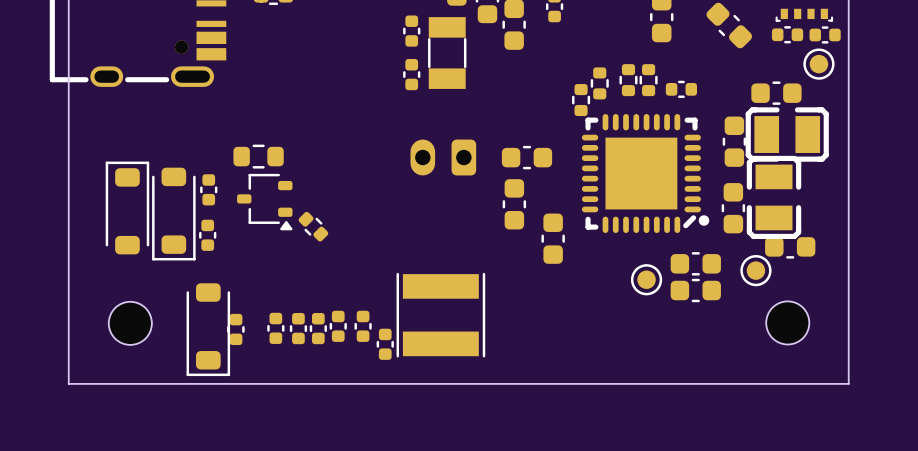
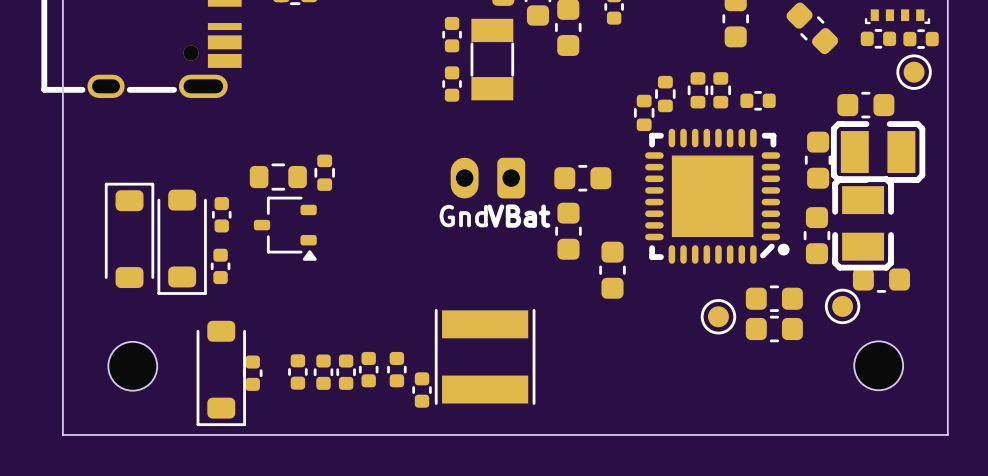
part: none -> (324, 172)
text: none -> Gnd (463, 216)
text: none -> VBat (518, 216)
part: (313, 226) -> none

